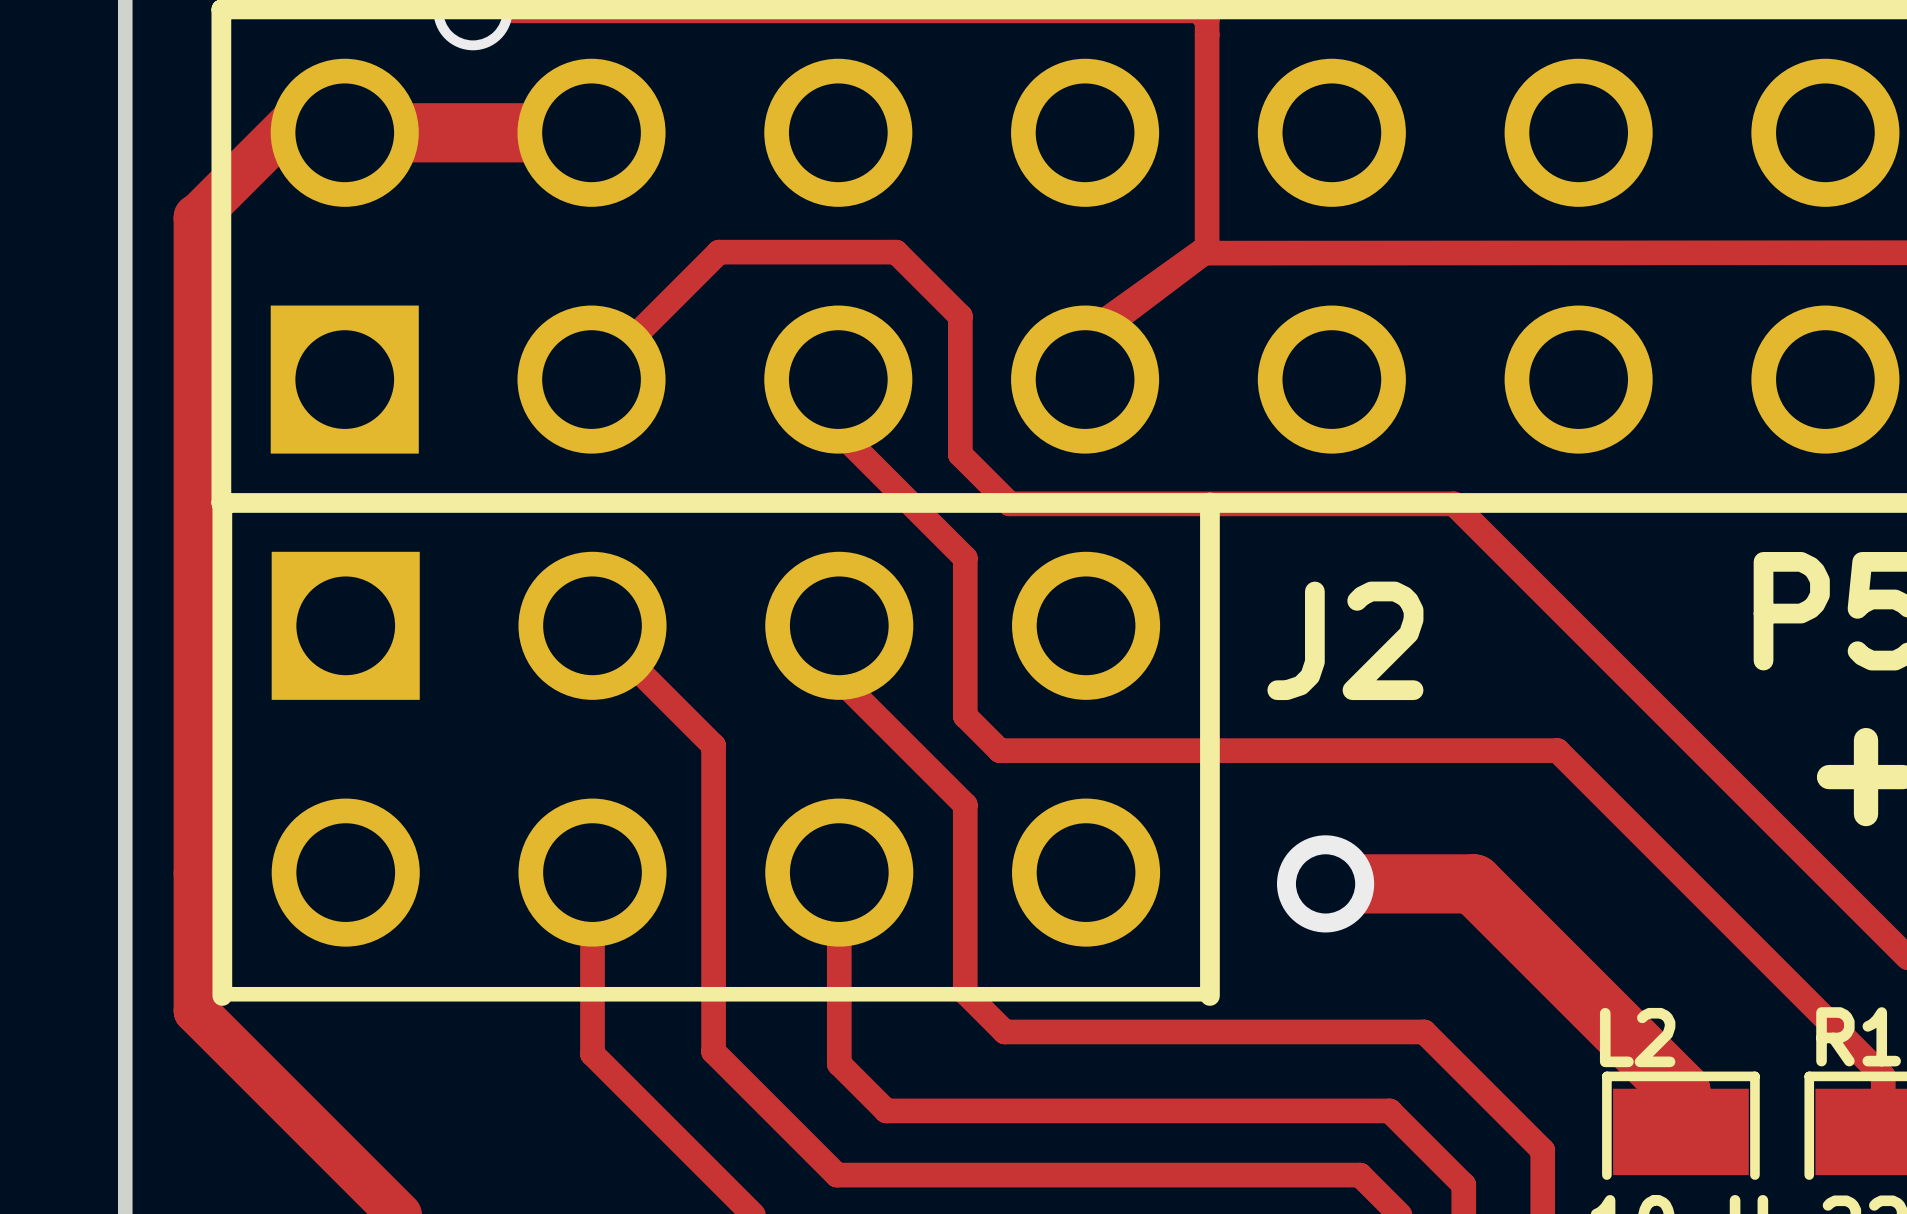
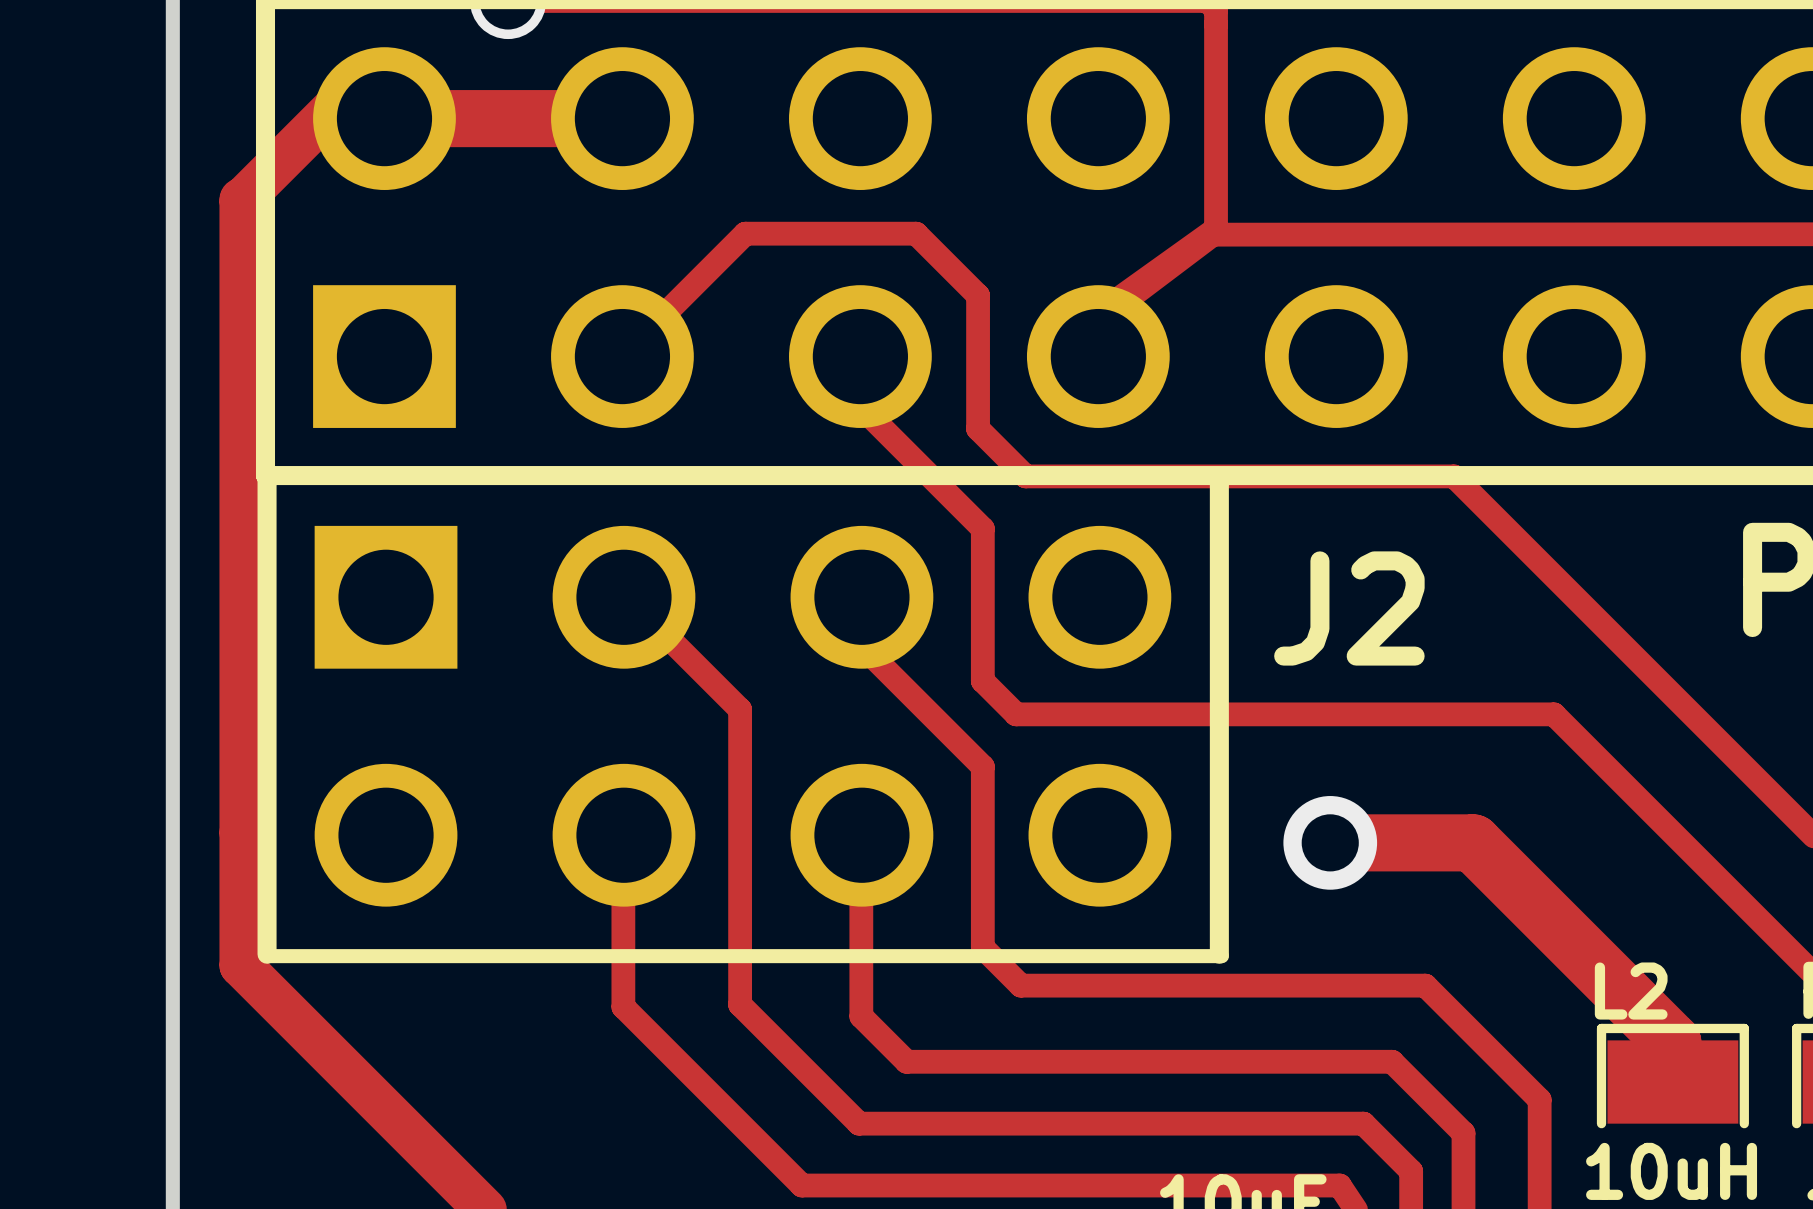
J2 footprint: [212, 492, 1220, 1006] -> [257, 468, 1230, 964]

